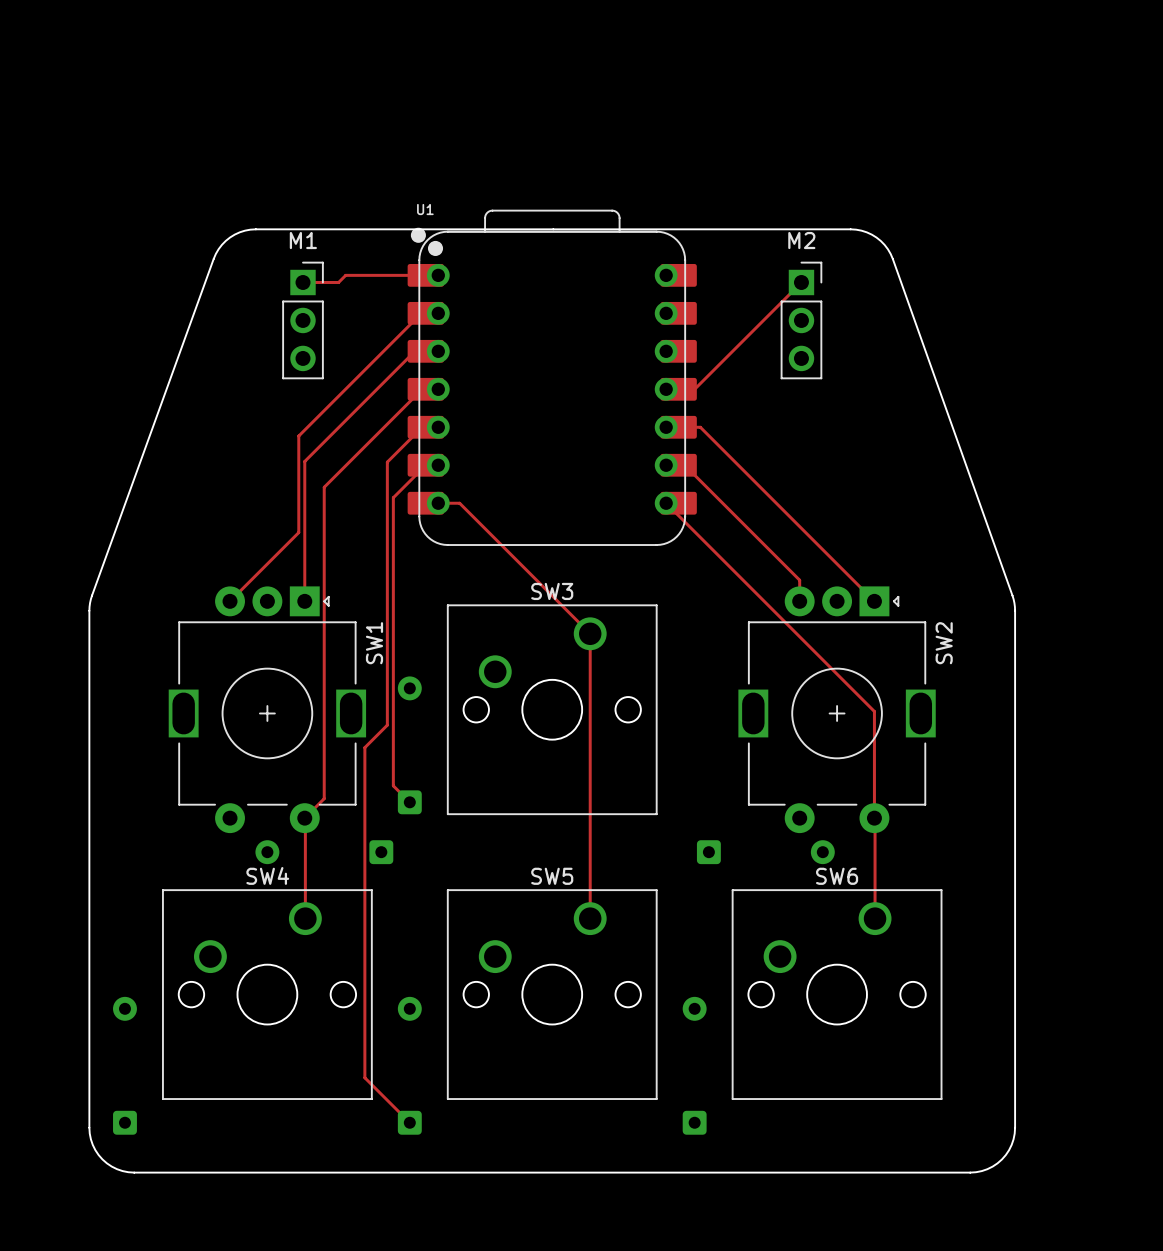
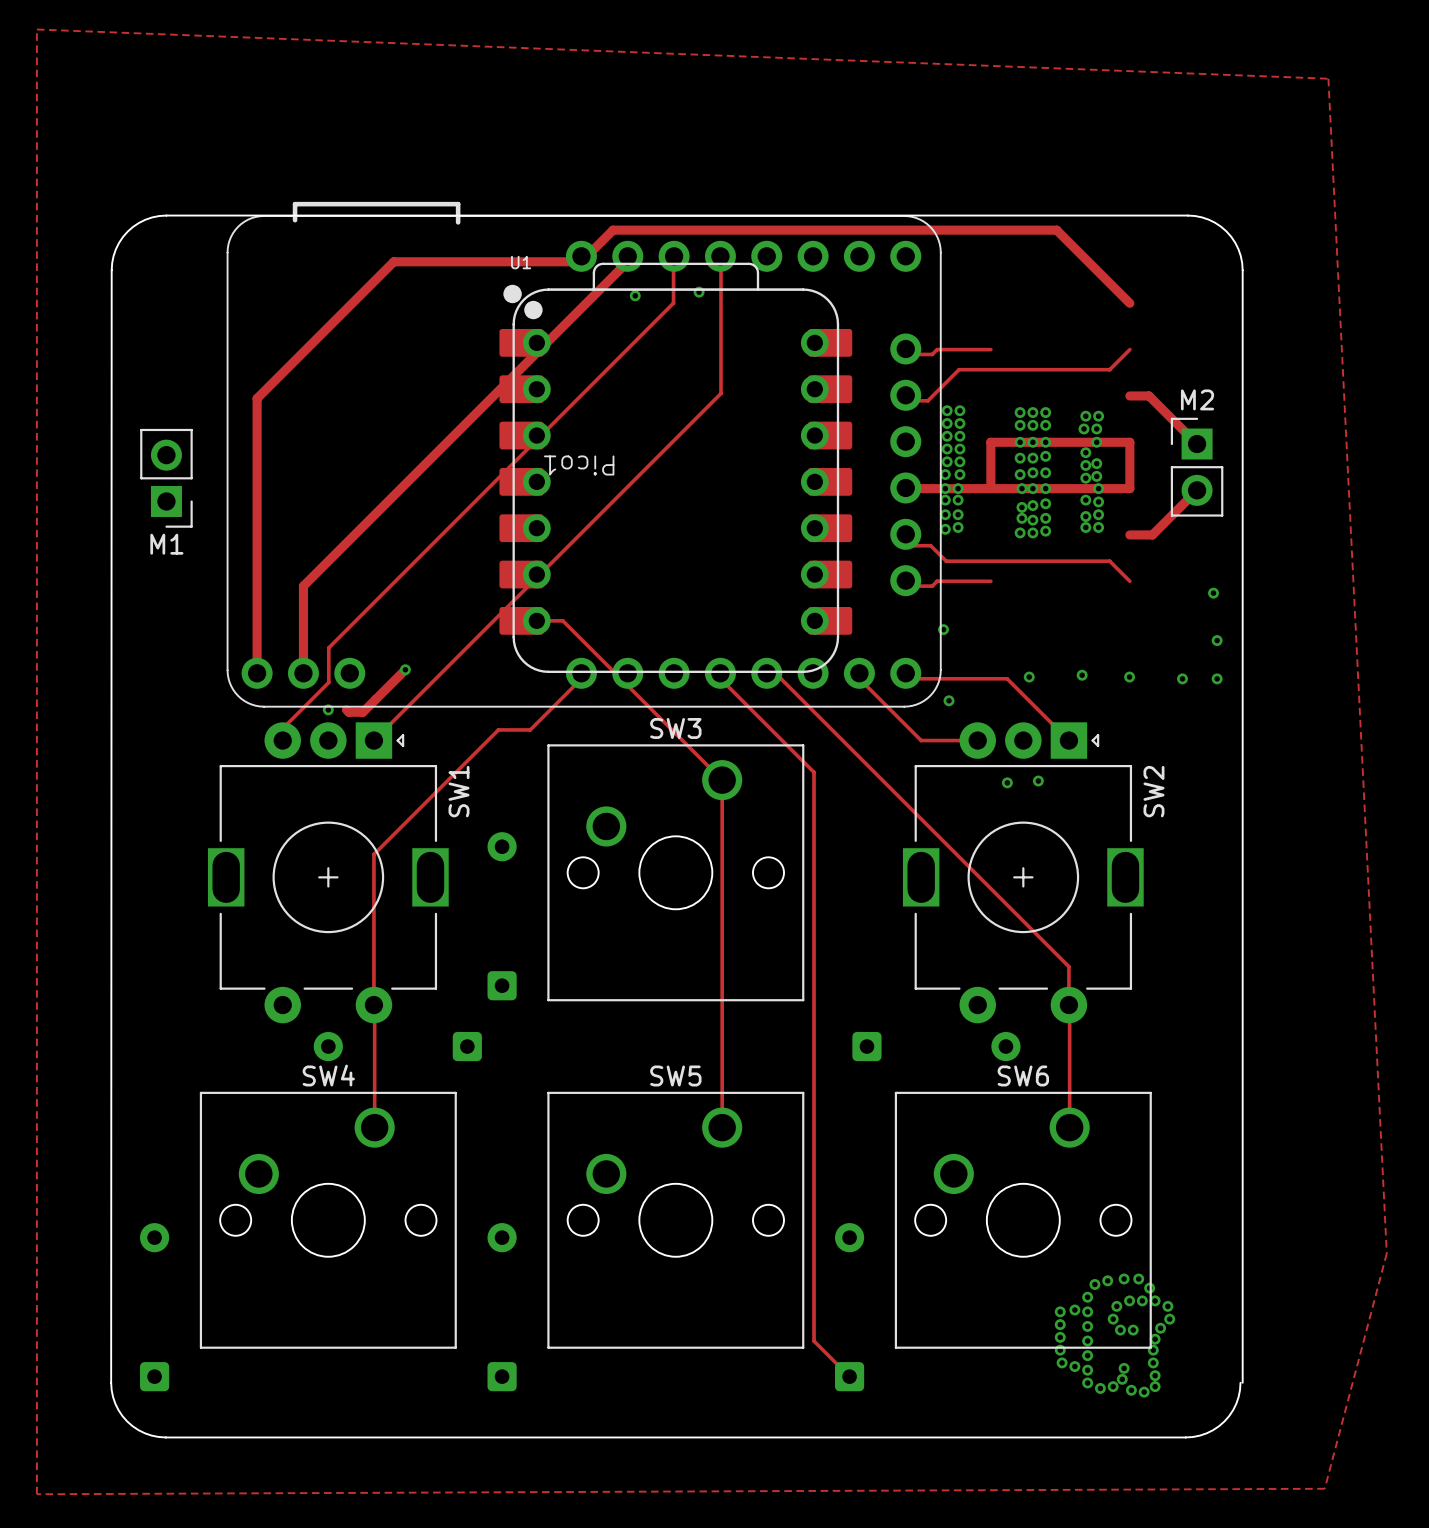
zone outline: none -> (36, 29) (36, 1494) (1324, 1488) (1386, 1253) (1328, 78) (36, 29)
track: none -> (627, 261) (303, 586) (303, 678)
via: none -> (699, 292)
via: none -> (635, 295)
M1 name position: M1 (303, 240) -> M1 (166, 544)
track: none -> (1129, 303) (1056, 230) (613, 230) (581, 261) (393, 261) (257, 398) (257, 678)
M1 footprint: [282, 261, 324, 380] -> [140, 428, 193, 528]
M2 footprint: [780, 261, 823, 380] -> [1170, 417, 1224, 517]
track: (438, 275) (345, 275) (338, 282) (303, 282) -> none
track: none -> (990, 349) (937, 349) (932, 354) (905, 354)
track: none -> (1129, 349) (1109, 369) (959, 369) (927, 400) (905, 400)
track: (801, 282) (694, 389) (666, 389) -> none
track: (438, 313) (421, 313) (298, 436) (298, 532) (230, 601) -> (674, 256) (673, 303) (328, 647) (328, 682) (282, 728) (282, 740)
track: none -> (1129, 395) (1149, 395) (1197, 444)
via: none -> (947, 410)
via: none -> (959, 410)
via: none -> (1020, 412)
via: none -> (1032, 412)
via: none -> (1045, 412)
via: none -> (1085, 416)
via: none -> (1098, 416)
via: none -> (947, 423)
via: none -> (959, 423)
via: none -> (1020, 425)
via: none -> (1032, 425)
via: none -> (1045, 425)
via: none -> (1083, 428)
via: none -> (1096, 428)
track: (425, 351) (414, 351) (304, 461) (304, 601) -> (720, 261) (720, 393) (373, 740)
via: none -> (947, 436)
via: none -> (959, 436)
via: none -> (1020, 442)
via: none -> (1032, 442)
via: none -> (1045, 442)
via: none -> (1096, 442)
via: none -> (947, 449)
via: none -> (959, 449)
via: none -> (1085, 452)
Pico1: none -> (584, 454)
via: none -> (1045, 456)
via: none -> (1020, 458)
via: none -> (1032, 458)
via: none -> (947, 461)
via: none -> (959, 461)
via: none -> (1096, 463)
via: none -> (1085, 465)
via: none -> (1032, 472)
via: none -> (1045, 472)
via: none -> (945, 474)
via: none -> (959, 474)
via: none -> (1020, 474)
via: none -> (1096, 476)
via: none -> (1085, 478)
track: (438, 389) (422, 389) (324, 487) (324, 798) (304, 818) -> (581, 678) (530, 729) (498, 729) (373, 854) (373, 1005)
via: none -> (945, 488)
via: none -> (958, 488)
track: none -> (990, 488) (990, 442) (1129, 442) (1129, 488) (910, 488) (905, 493)
via: none -> (1021, 488)
via: none -> (1032, 488)
via: none -> (1045, 488)
via: none -> (1098, 488)
track: none -> (1197, 490) (1152, 534) (1129, 534)
via: none -> (945, 500)
via: none -> (958, 500)
via: none -> (1085, 500)
via: none -> (1098, 501)
via: none -> (1045, 503)
via: none -> (1032, 505)
via: none -> (1021, 507)
via: none -> (945, 514)
via: none -> (958, 514)
via: none -> (1098, 514)
via: none -> (1085, 516)
via: none -> (1021, 518)
via: none -> (1045, 518)
via: none -> (1032, 520)
via: none -> (958, 527)
via: none -> (1085, 527)
via: none -> (1098, 527)
track: (438, 427) (422, 427) (387, 462) (387, 725) (364, 747) (364, 1077) (409, 1122) -> none
track: (666, 427) (700, 427) (823, 550) -> (905, 678) (1007, 678)
via: none -> (945, 529)
via: none -> (1045, 531)
via: none -> (1020, 532)
via: none -> (1032, 532)
track: none -> (905, 539) (911, 545) (930, 545) (946, 561) (1109, 561) (1129, 581)
track: (438, 465) (425, 465) (393, 497) (393, 785) (409, 802) -> none
track: (666, 465) (684, 465) (799, 580) (799, 601) -> (859, 678) (921, 740) (977, 740)
track: none -> (990, 581) (937, 581) (932, 586) (905, 586)
via: none -> (1213, 593)
track: (666, 503) (874, 711) (874, 786) -> (766, 678) (781, 678) (1068, 966)
via: none -> (943, 629)
via: none -> (1217, 640)
track: none -> (405, 669) (362, 712) (348, 712) (346, 709)
via: none -> (405, 669)
via: none -> (1082, 675)
via: none -> (1029, 677)
via: none -> (1129, 677)
track: none -> (720, 678) (814, 772) (814, 1341) (849, 1376)
via: none -> (1182, 678)
via: none -> (1217, 678)
via: none -> (948, 700)
via: none -> (328, 709)
via: none -> (1038, 781)
via: none -> (1007, 782)
via: none -> (1124, 1279)
via: none -> (1138, 1279)
via: none -> (1107, 1280)
via: none -> (1094, 1284)
via: none -> (1149, 1288)
via: none -> (1087, 1297)
via: none -> (1129, 1300)
via: none -> (1142, 1300)
via: none -> (1155, 1300)
via: none -> (1116, 1306)
via: none -> (1167, 1306)
via: none -> (1074, 1310)
via: none -> (1060, 1311)
via: none -> (1087, 1311)
via: none -> (1113, 1319)
via: none -> (1169, 1319)
via: none -> (1060, 1324)
via: none -> (1087, 1326)
via: none -> (1160, 1328)
via: none -> (1120, 1330)
via: none -> (1133, 1330)
via: none -> (1060, 1337)
via: none -> (1155, 1339)
via: none -> (1087, 1341)
via: none -> (1060, 1350)
via: none -> (1153, 1350)
via: none -> (1087, 1355)
via: none -> (1062, 1362)
via: none -> (1153, 1362)
via: none -> (1074, 1366)
via: none -> (1124, 1368)
via: none -> (1087, 1370)
via: none -> (1155, 1375)
via: none -> (1122, 1379)
board edge: (89, 1127) (90, 603) (215, 253) (221, 244) (234, 234) (255, 229) (850, 229) (866, 232) (884, 244) (892, 259) (1014, 603) (1015, 1127) -> (111, 1382) (111, 270) (115, 249) (127, 231) (145, 219) (166, 215) (1187, 215) (1208, 219) (1226, 231) (1238, 249) (1242, 270) (1242, 1382)
via: none -> (1087, 1382)
via: none -> (1113, 1386)
via: none -> (1155, 1386)
via: none -> (1100, 1388)
via: none -> (1131, 1390)
via: none -> (1144, 1392)

